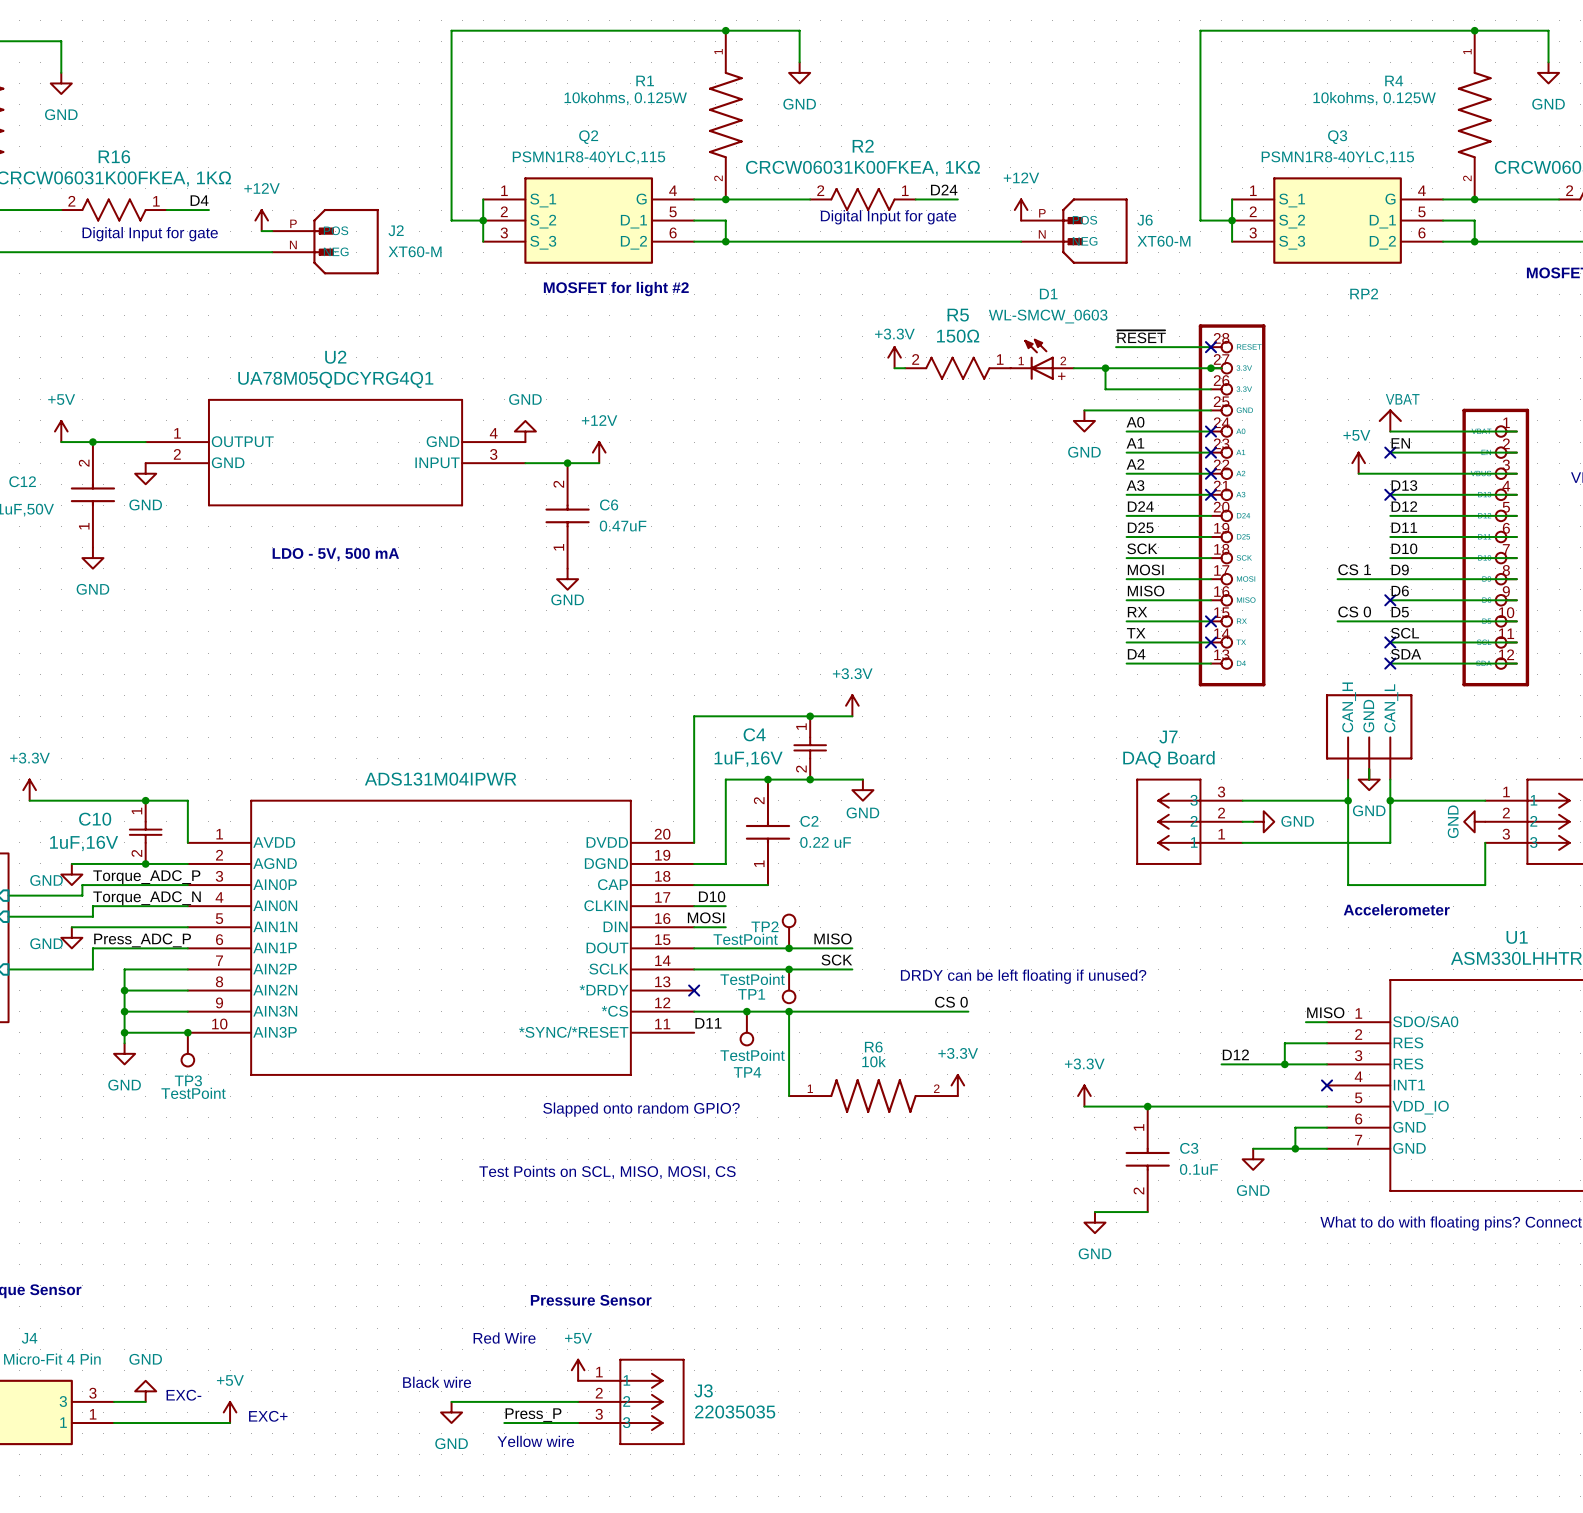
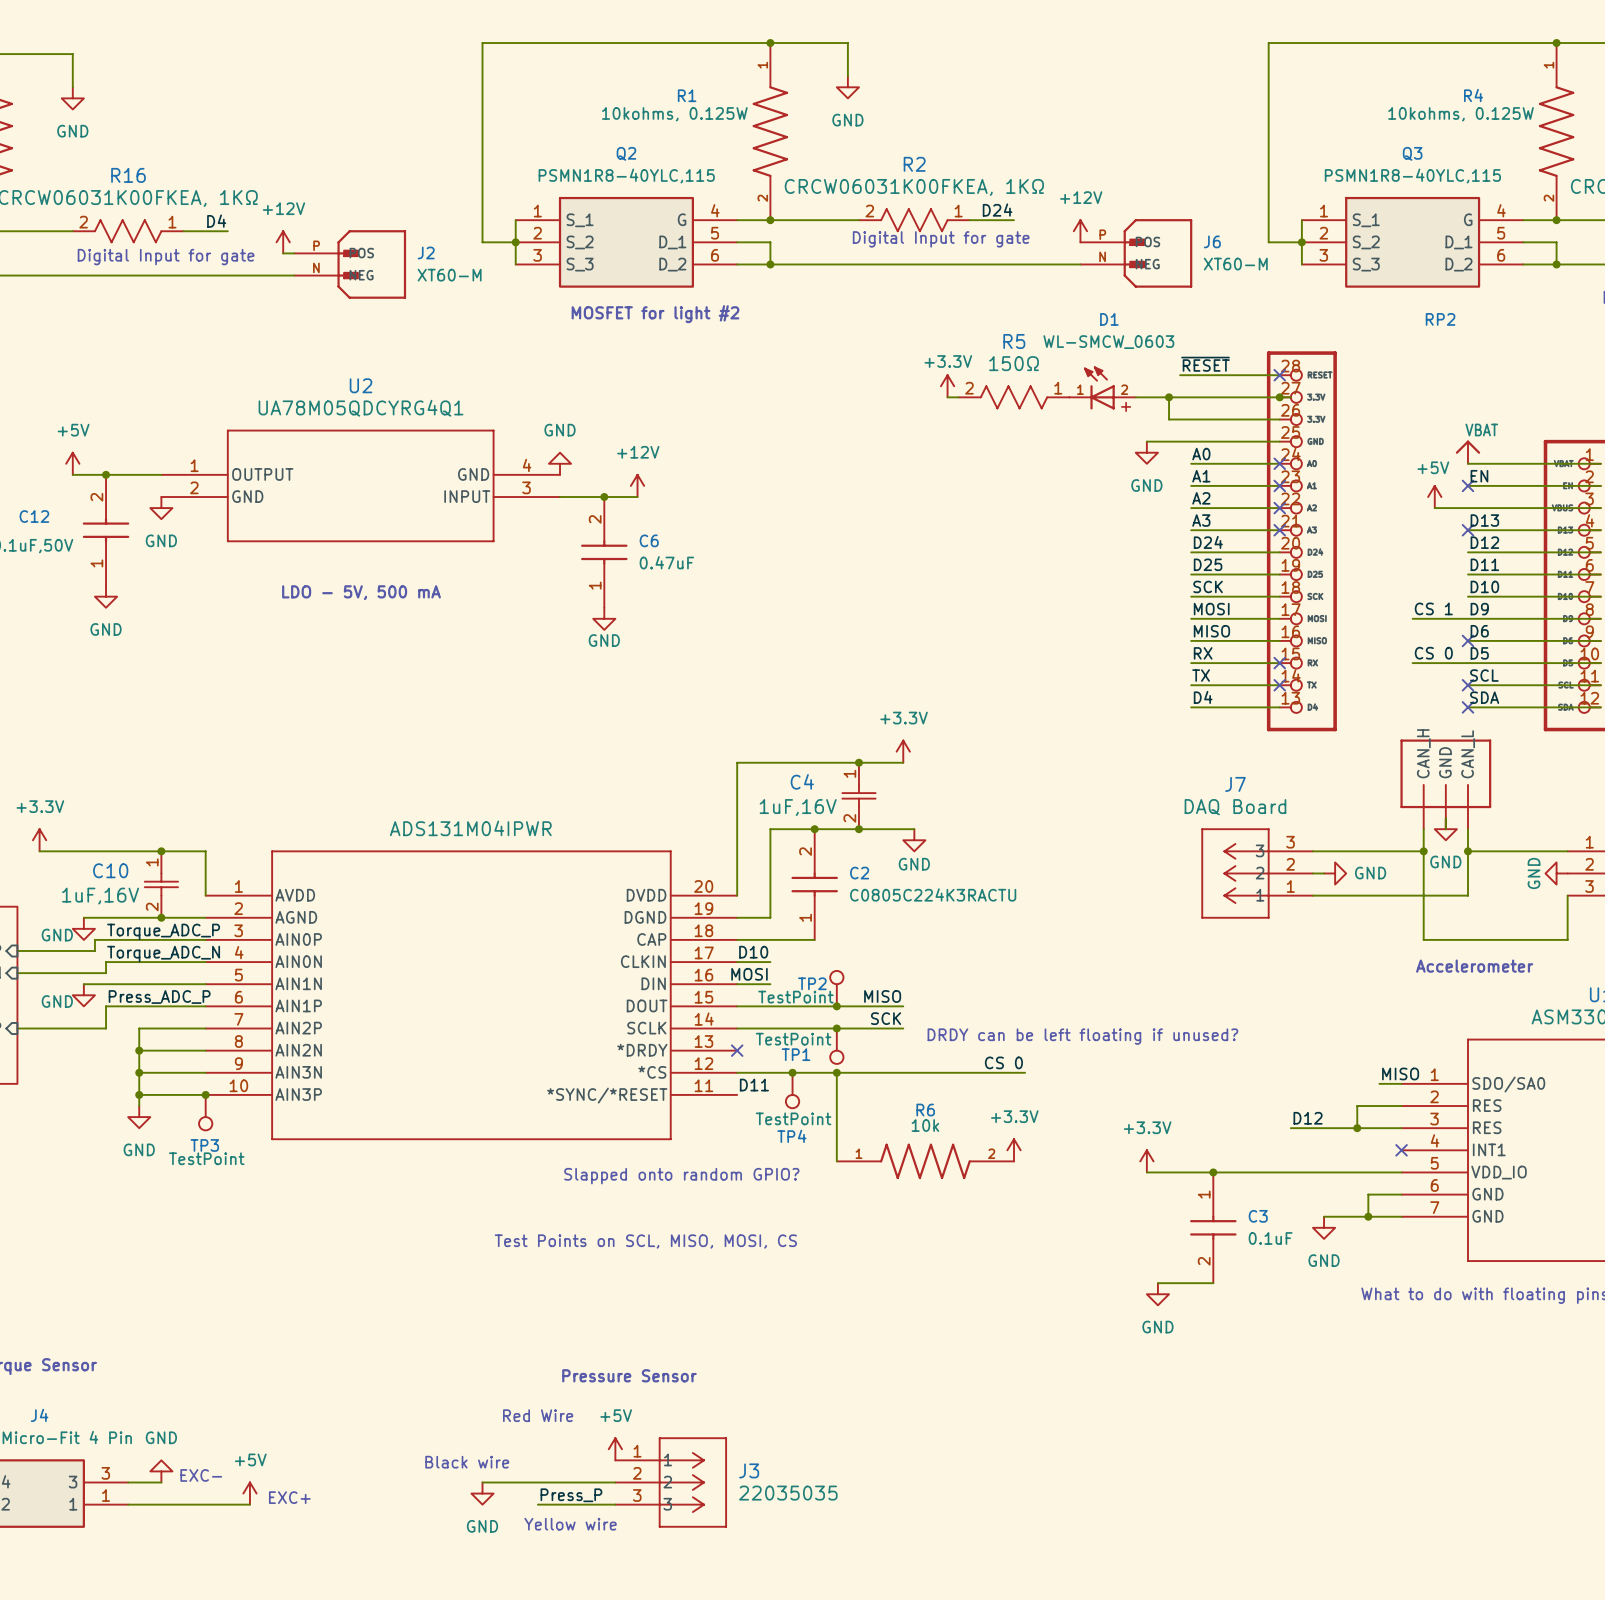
C2 value: 0.22 uF (825, 842) -> C0805C224K3RACTU (933, 894)

